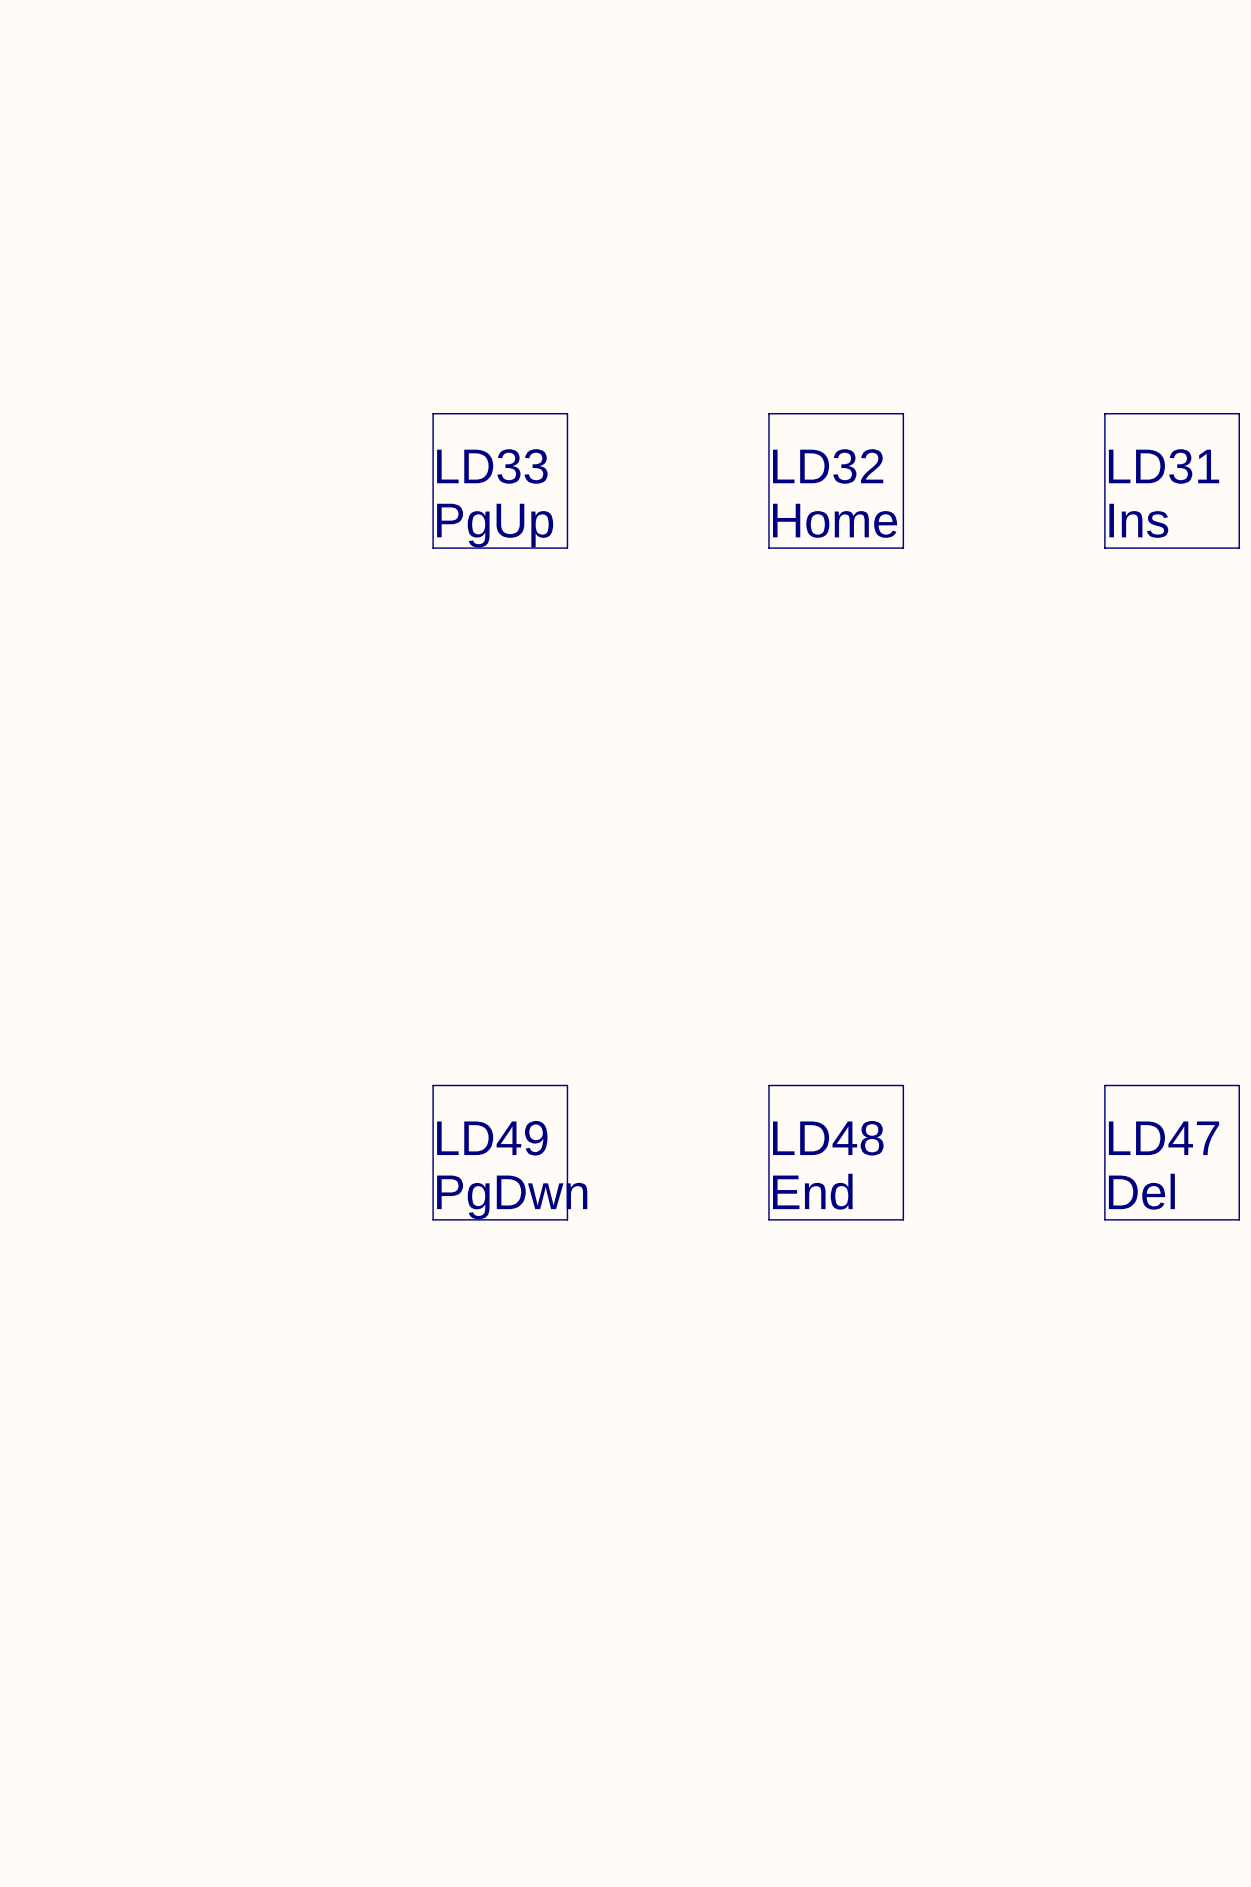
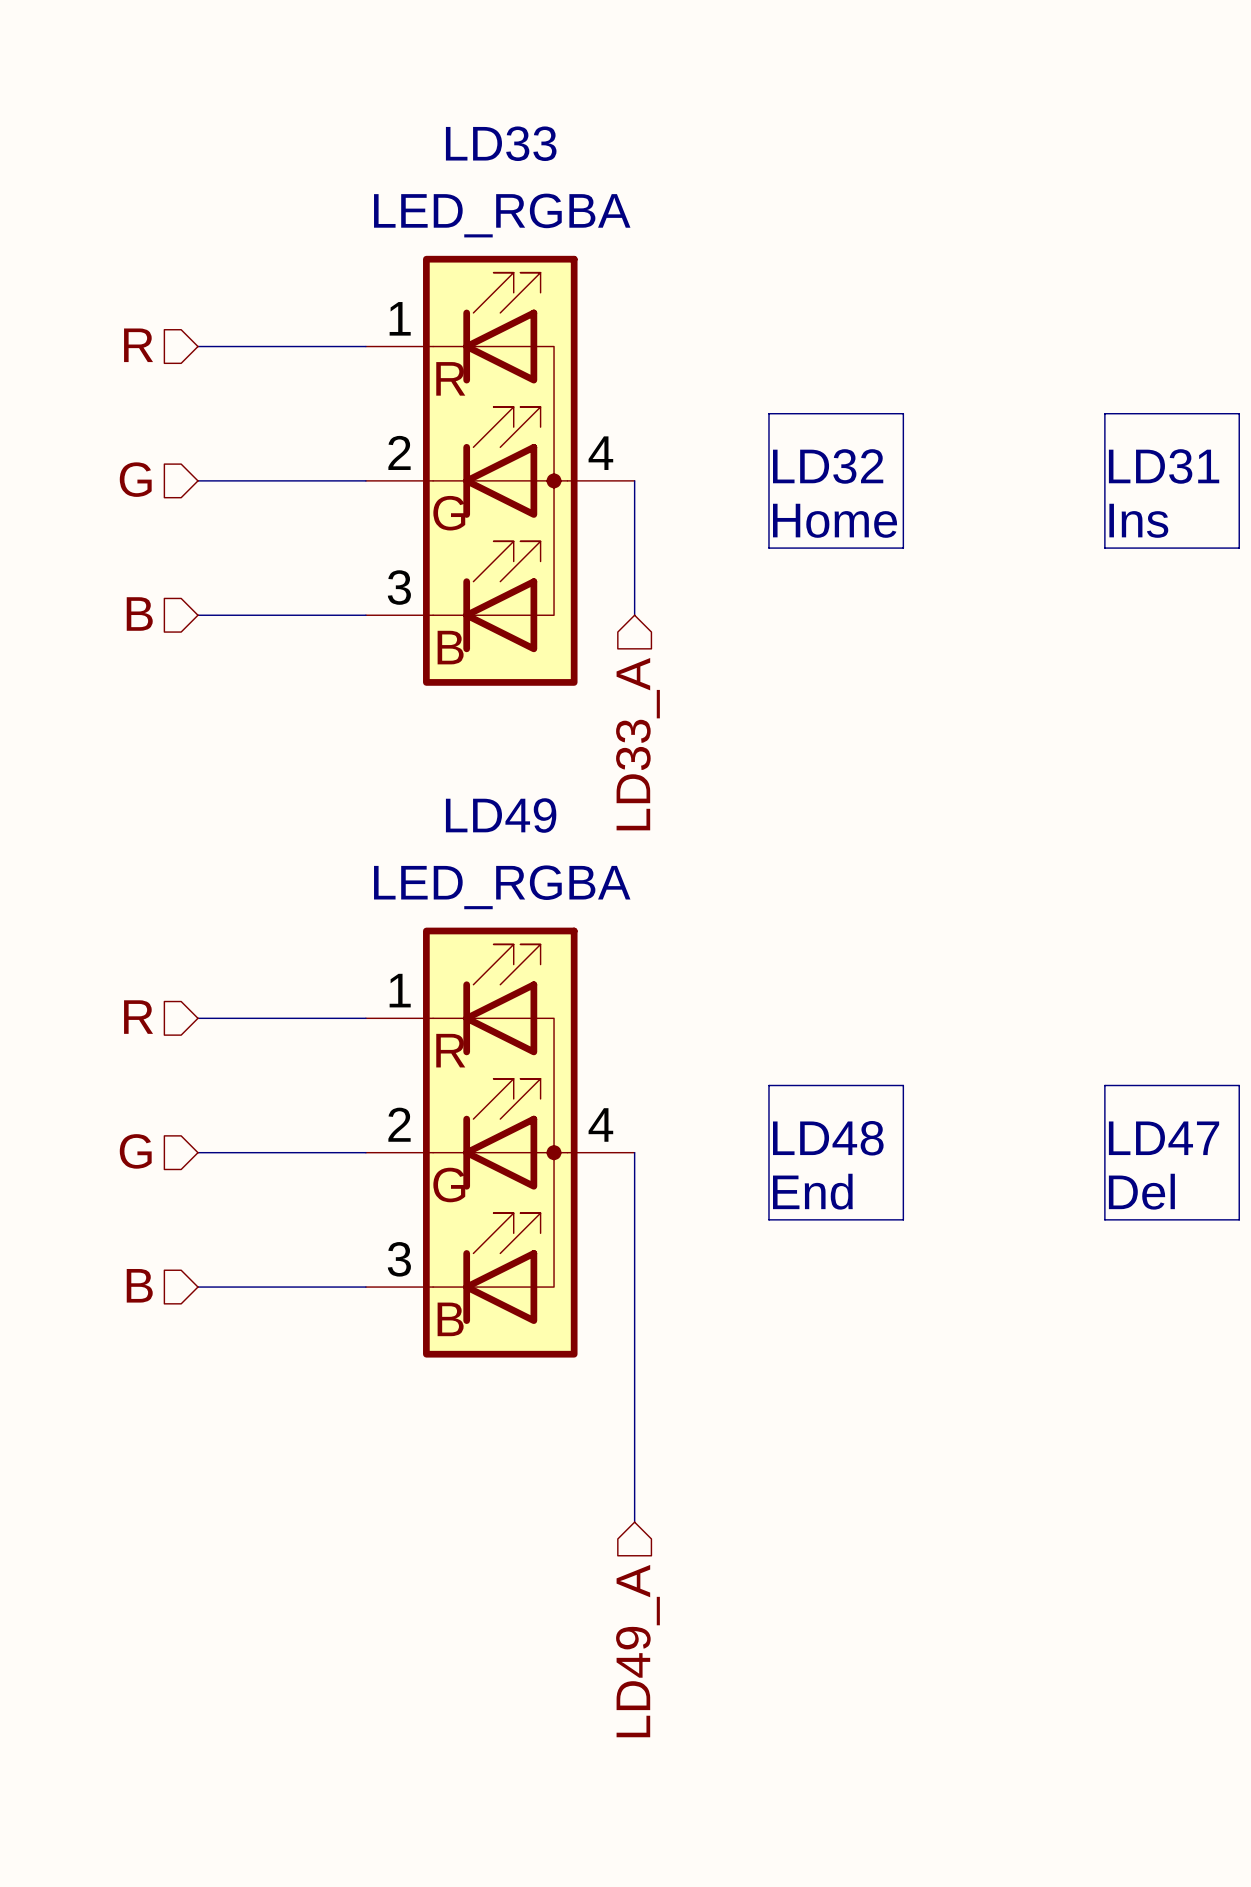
hierarchical label: none -> R (138, 345)
wire: none -> (197, 346) (365, 346)
line: (433, 413) (567, 413) (567, 548) (433, 548) (433, 413) -> none
text: LD33 (492, 466) -> none
LD33: none -> LED_RGBA (500, 470)
hierarchical label: none -> G (135, 479)
wire: none -> (197, 480) (365, 480)
wire: none -> (634, 480) (634, 615)
text: PgUp (495, 525) -> none
hierarchical label: none -> B (139, 613)
wire: none -> (197, 615) (365, 615)
hierarchical label: none -> LD33_A (637, 744)
hierarchical label: none -> R (138, 1017)
wire: none -> (197, 1018) (365, 1018)
line: (433, 1085) (433, 1219) (567, 1219) (567, 1085) (433, 1085) -> none
text: LD49 (492, 1138) -> none
LD49: none -> LED_RGBA (500, 1142)
hierarchical label: none -> G (135, 1151)
wire: none -> (197, 1152) (365, 1152)
wire: none -> (634, 1152) (634, 1522)
text: PgDwn (512, 1197) -> none
hierarchical label: none -> B (139, 1285)
wire: none -> (197, 1287) (365, 1287)
hierarchical label: none -> LD49_A (637, 1651)

